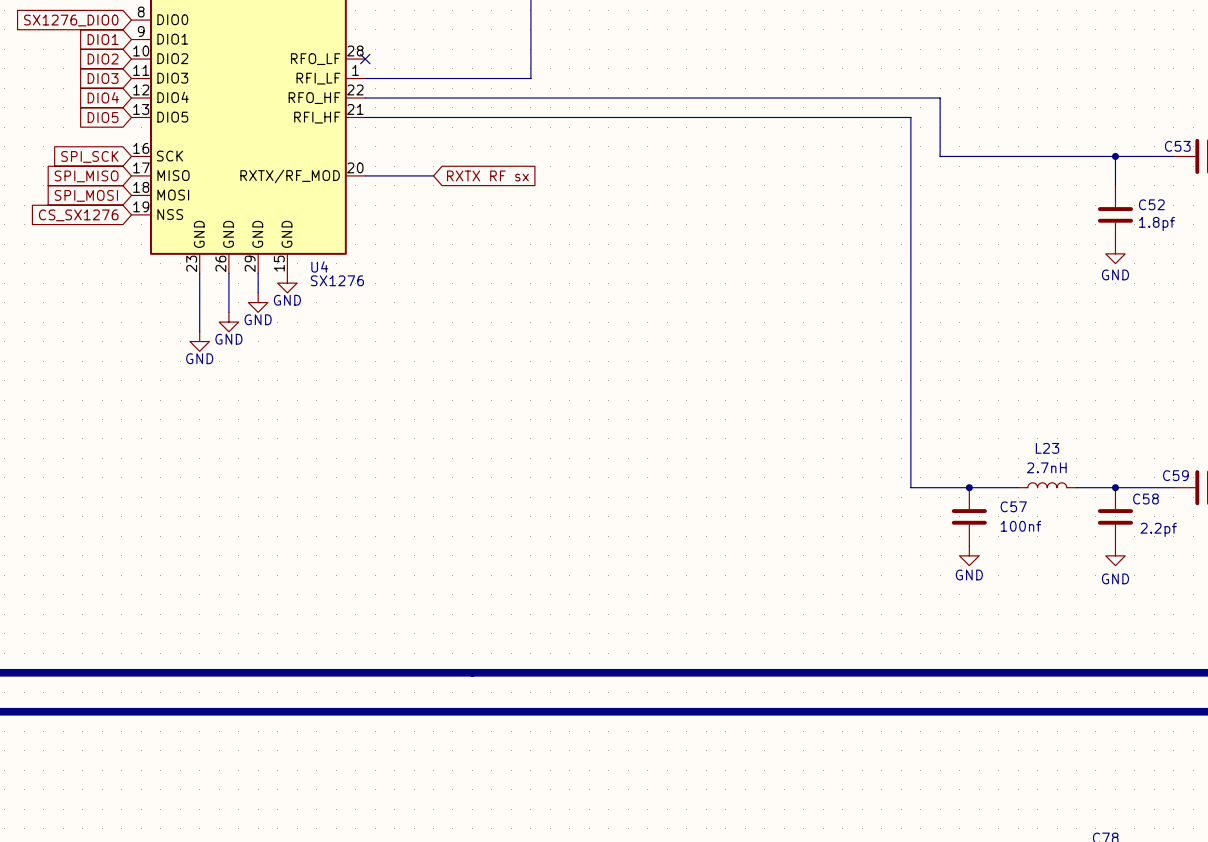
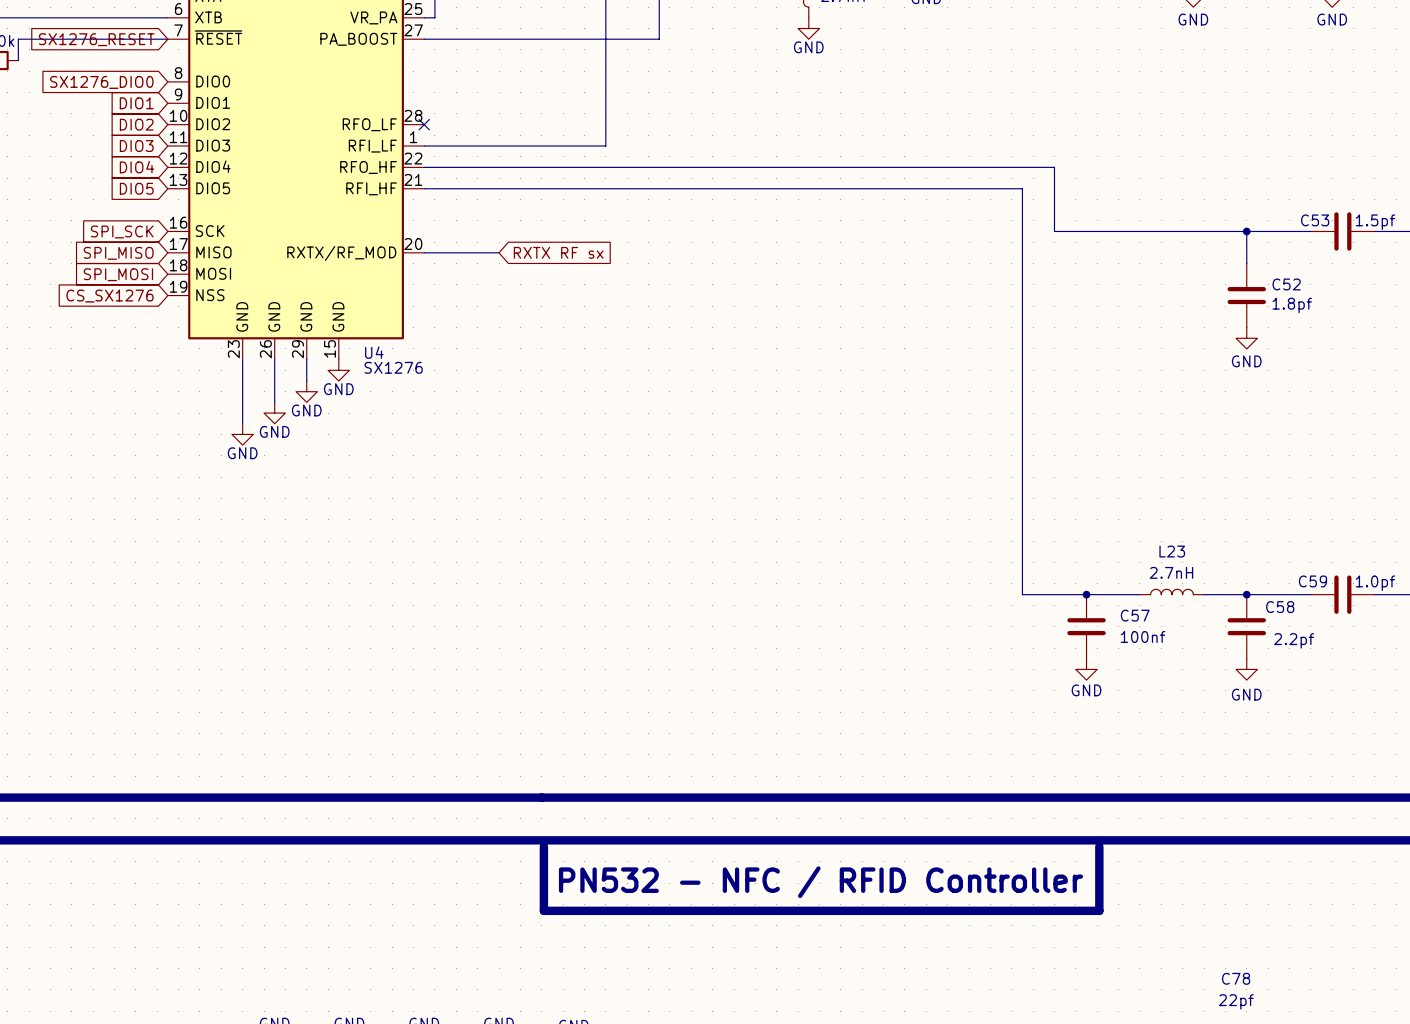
line: none -> (543, 846) (543, 910) (1099, 910) (1099, 846)
text: none -> PN532 - NFC / RFID Controller (821, 882)

